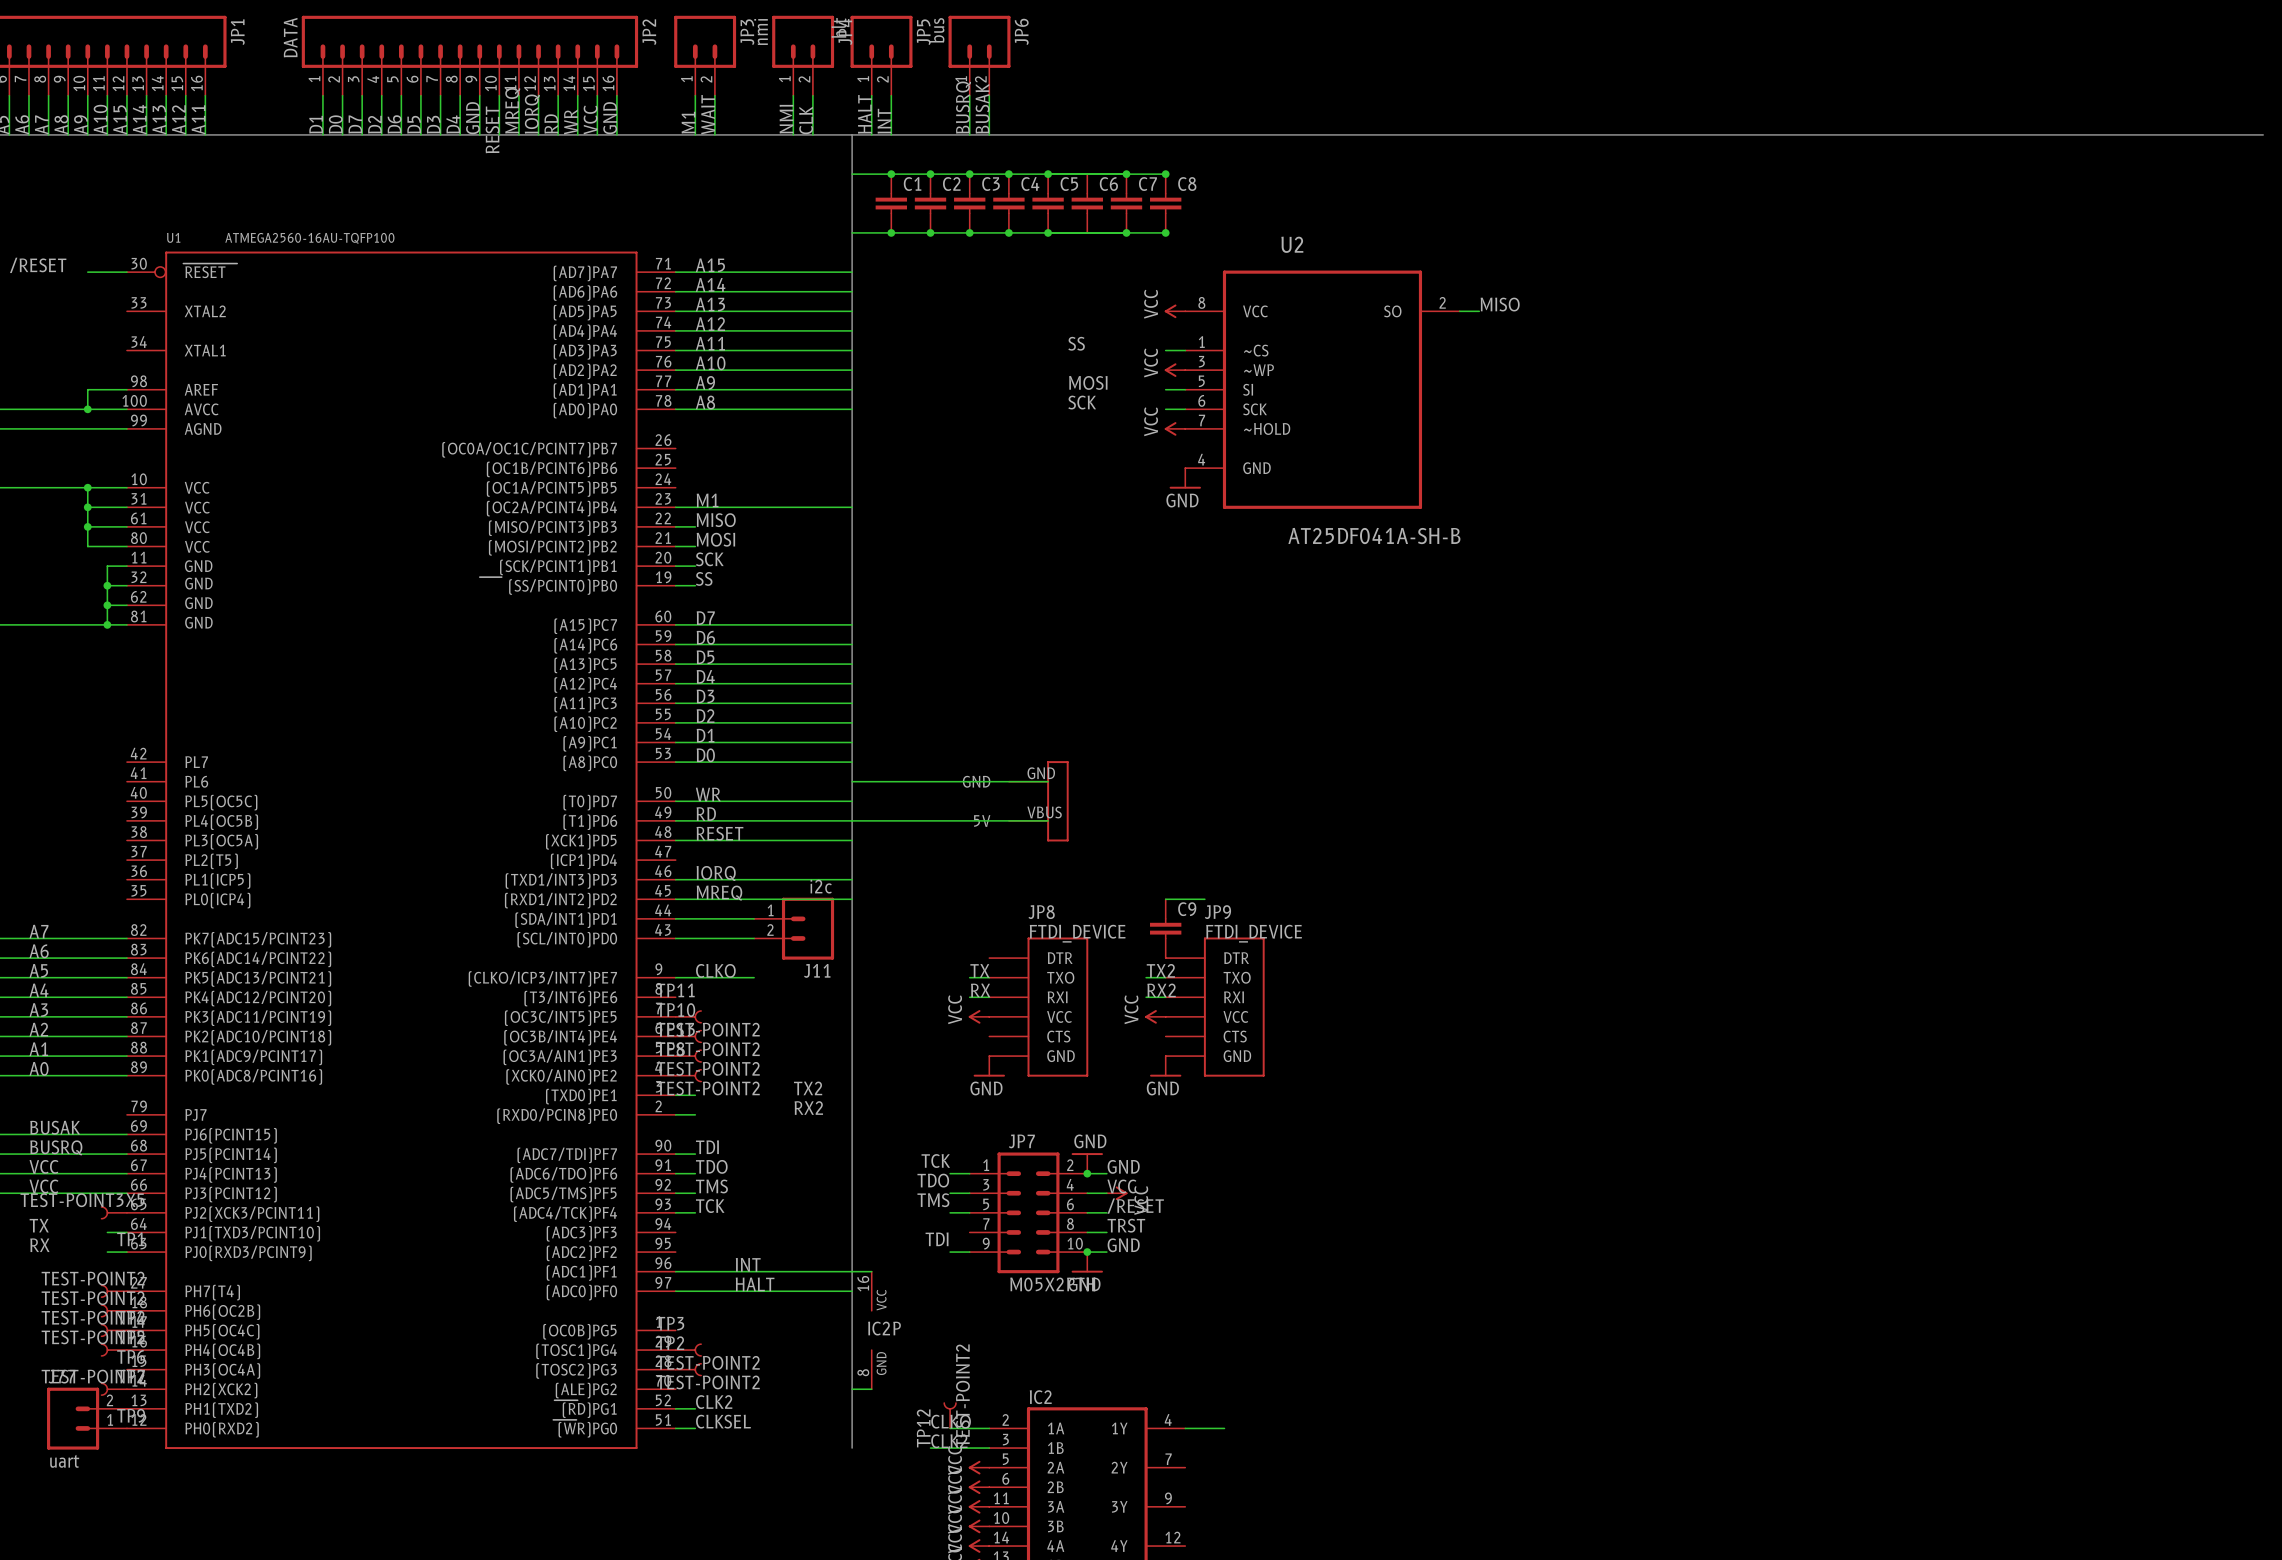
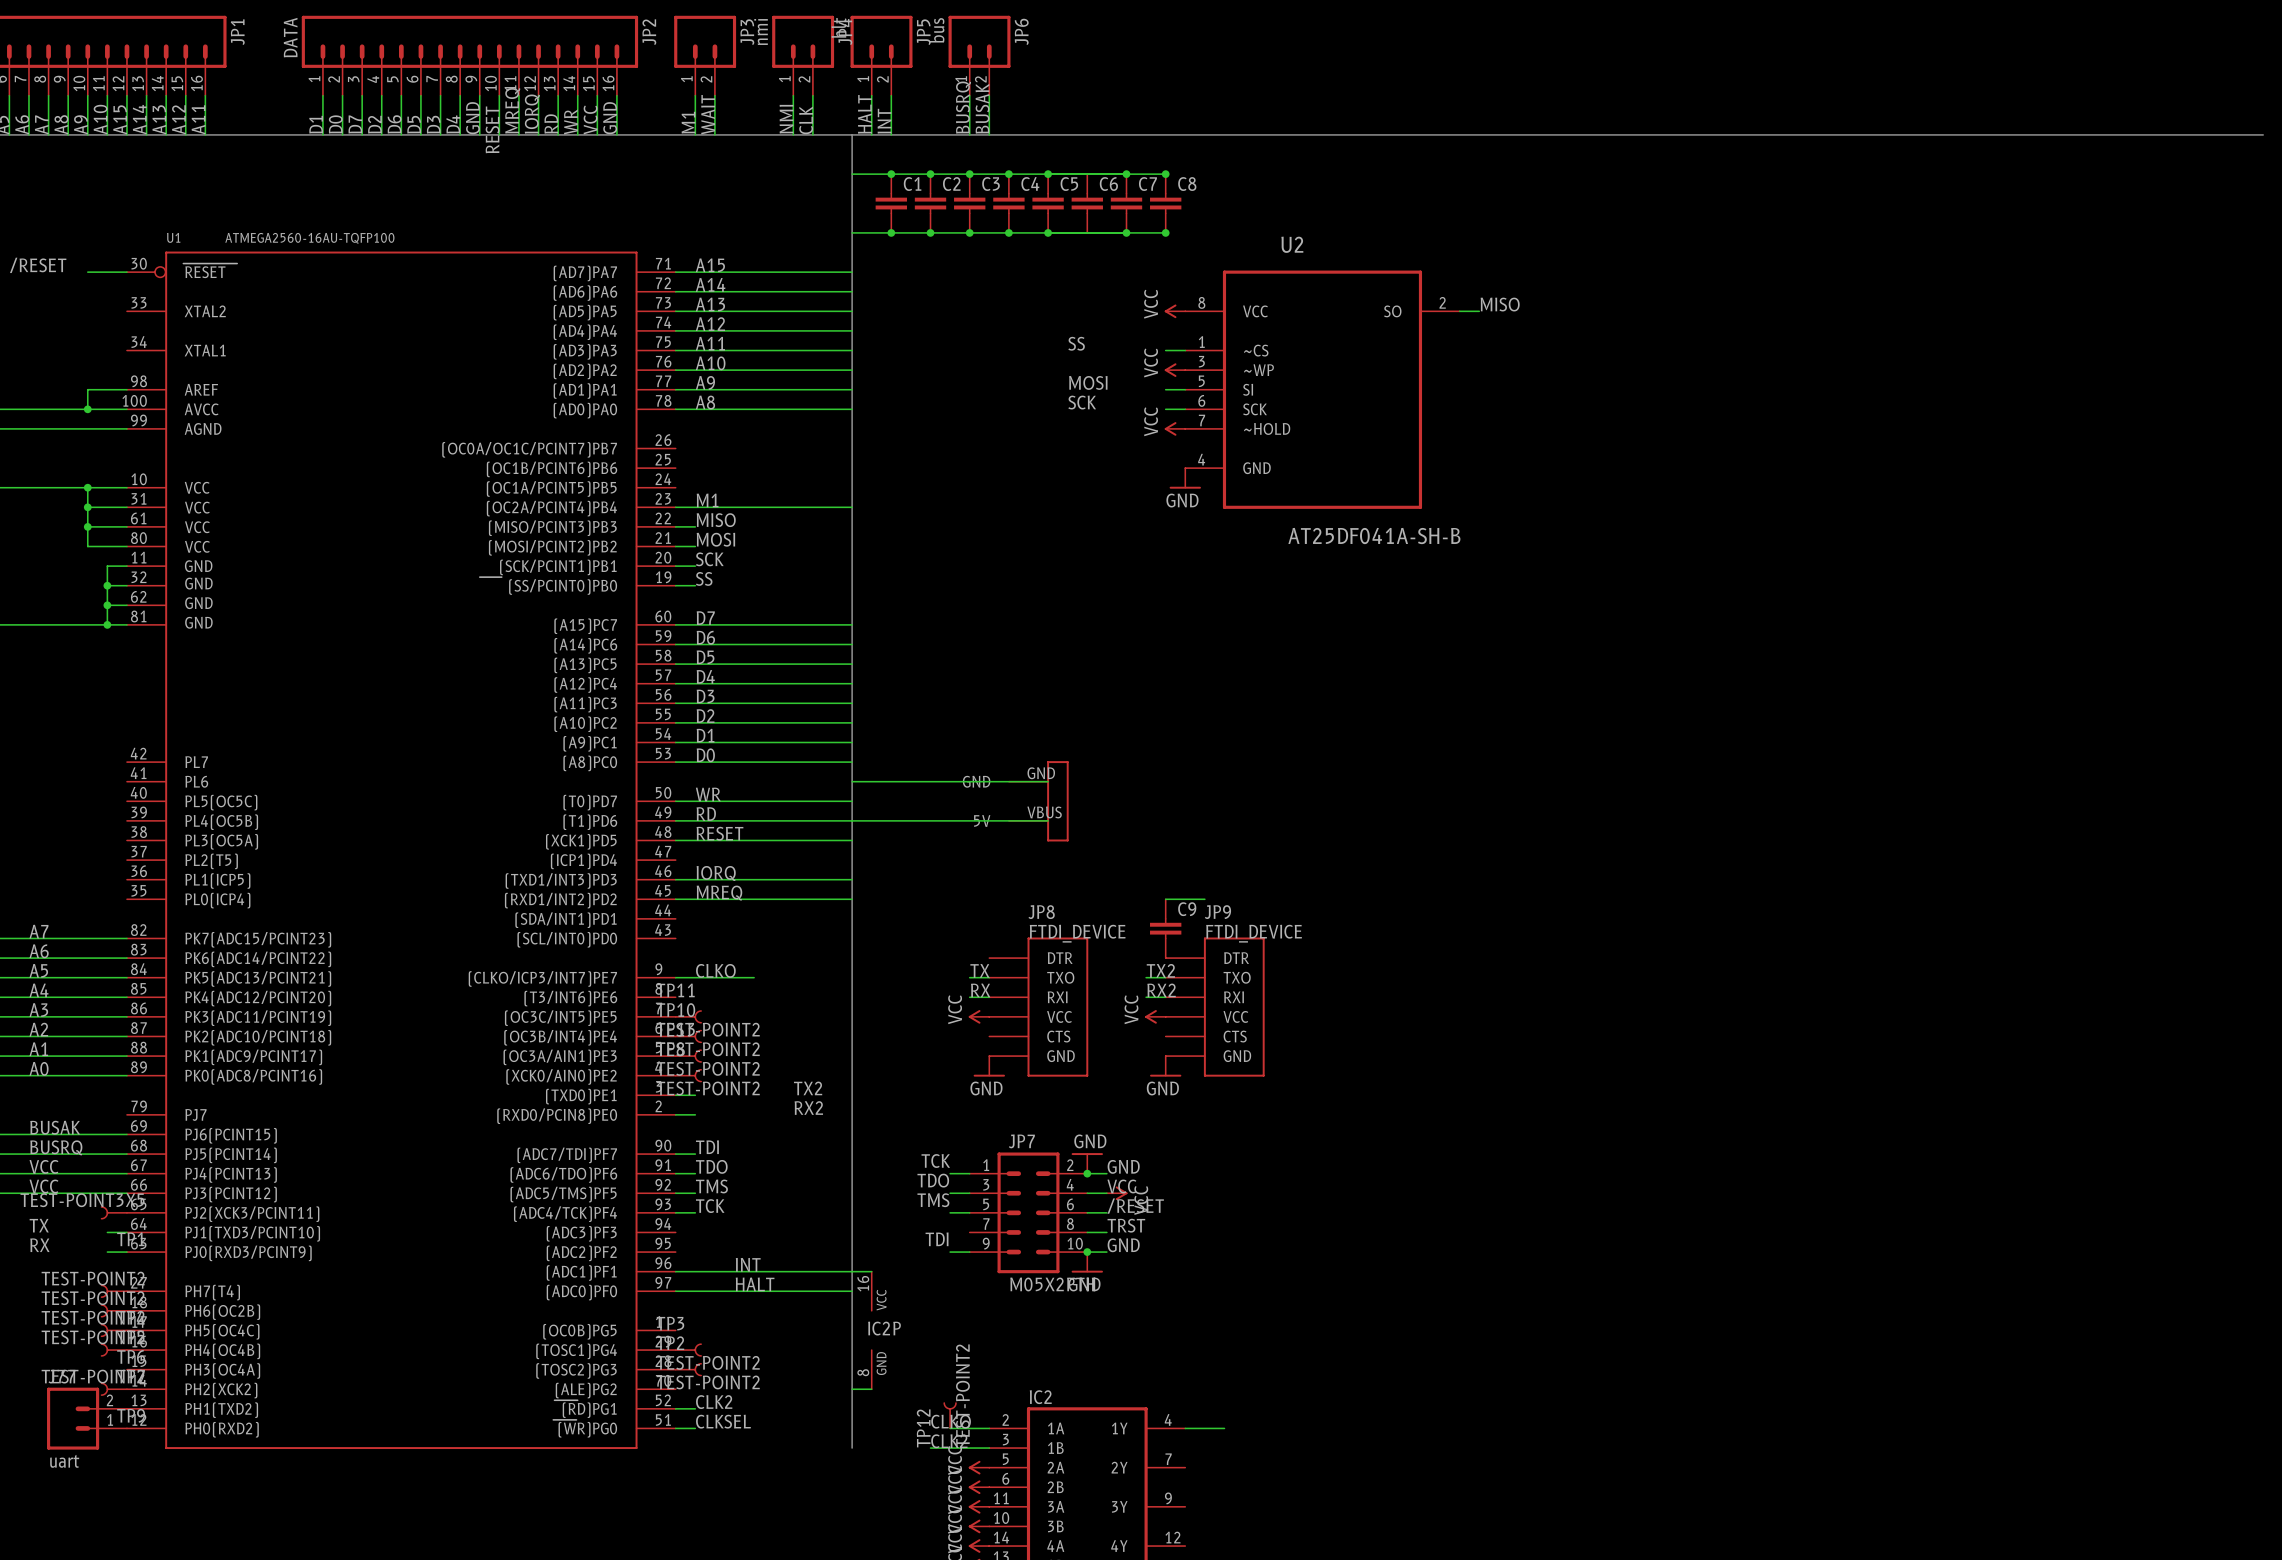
wire: (675, 918) (754, 918) -> none
J11: i2c (794, 928) -> none
wire: (675, 938) (754, 938) -> none

